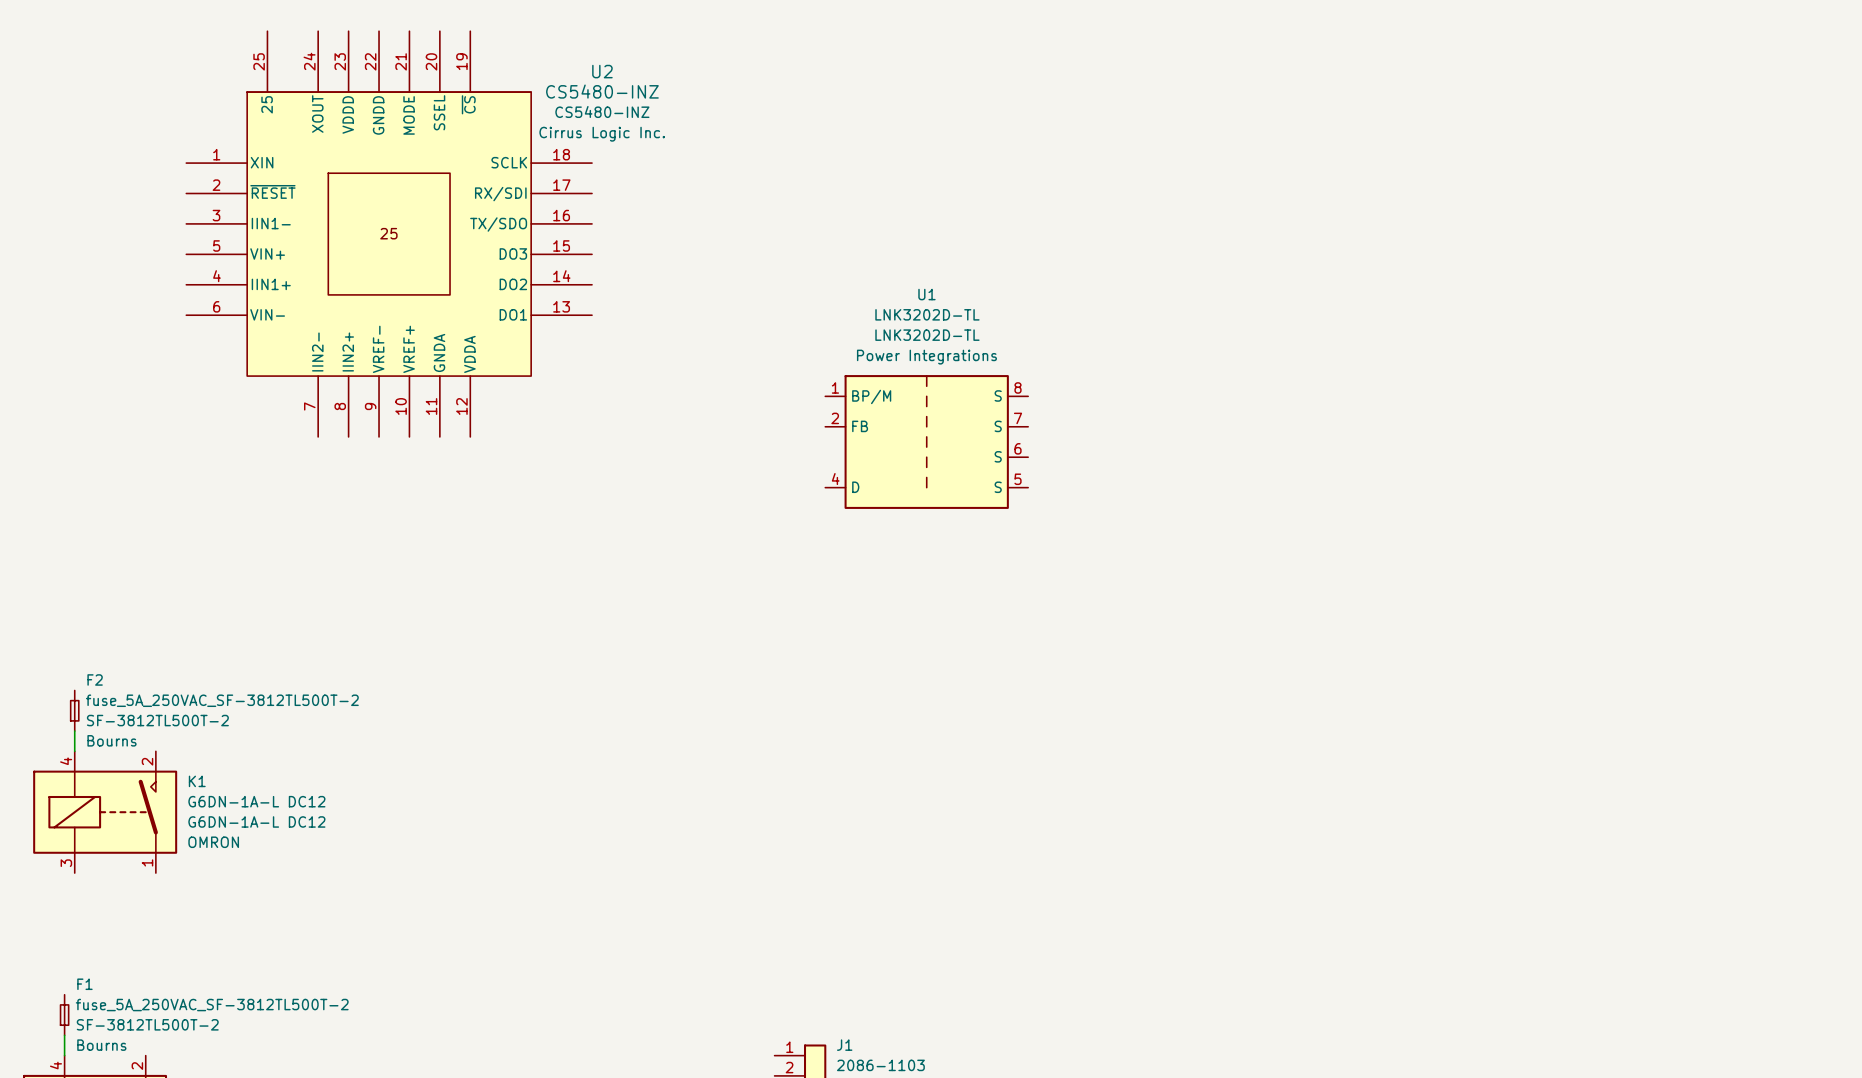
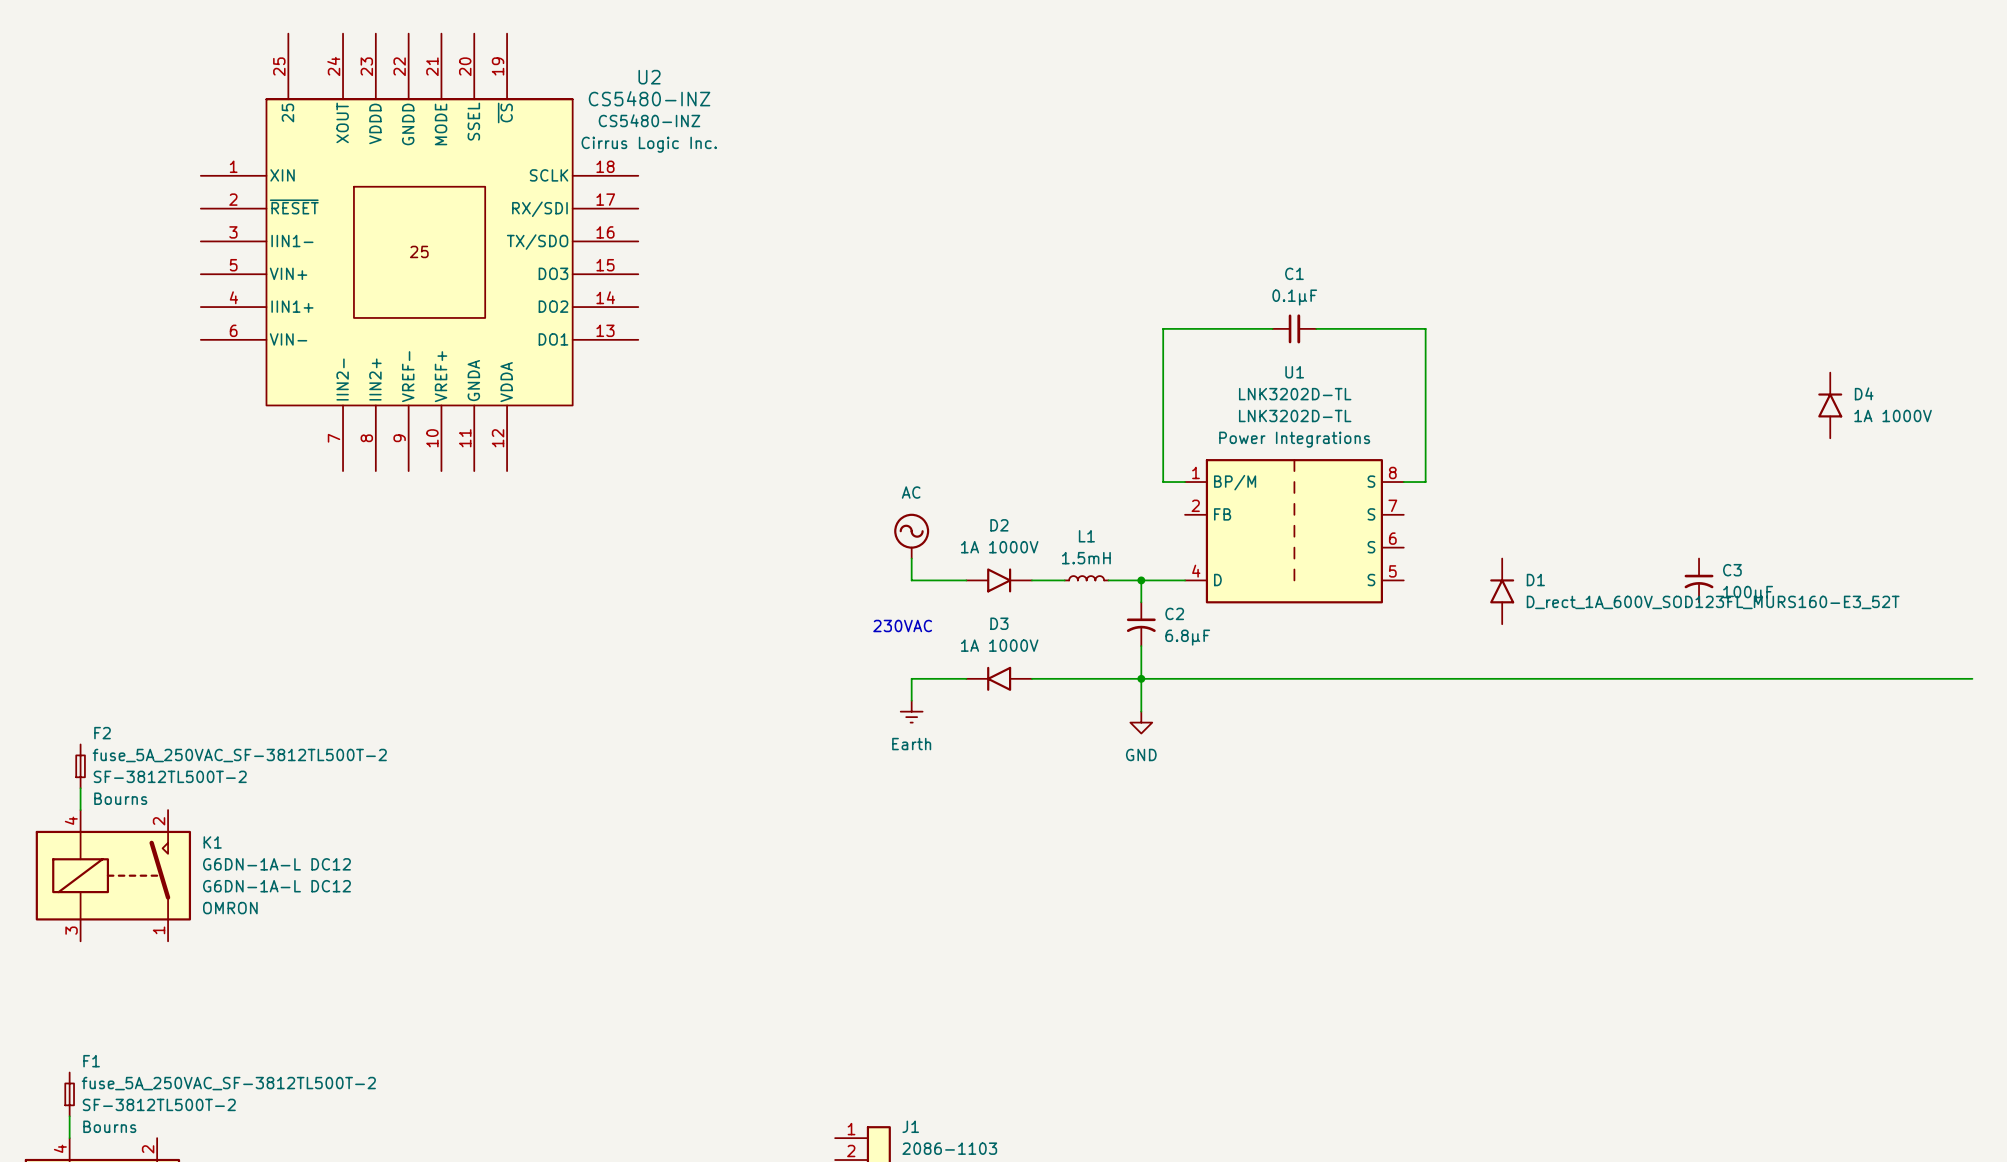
wire: none -> (1272, 328) (1163, 328) (1163, 482) (1185, 482)
C1: none -> (1294, 328)
wire: none -> (1316, 328) (1425, 328) (1425, 482) (1403, 482)
D4: none -> (1830, 405)
U1 position: (926, 441) -> (1294, 531)
power symbol: none -> AC (911, 536)
wire: none -> (911, 558) (911, 580) (966, 580)
L1: none -> (1086, 578)
D2: none -> (999, 580)
wire: none -> (1031, 580) (1064, 580)
wire: none -> (1108, 580) (1185, 580)
wire: none -> (1141, 580) (1141, 602)
junction: none -> (1141, 580)
C3: none -> (1699, 580)
D1: none -> (1502, 591)
C2: none -> (1141, 624)
text: none -> 230VAC (902, 625)
wire: none -> (1141, 646) (1141, 711)
wire: none -> (966, 678) (911, 678) (911, 700)
D3: none -> (999, 678)
wire: none -> (1031, 678) (1972, 678)
junction: none -> (1141, 678)
power symbol: none -> Earth (911, 711)
power symbol: none -> GND (1141, 722)

